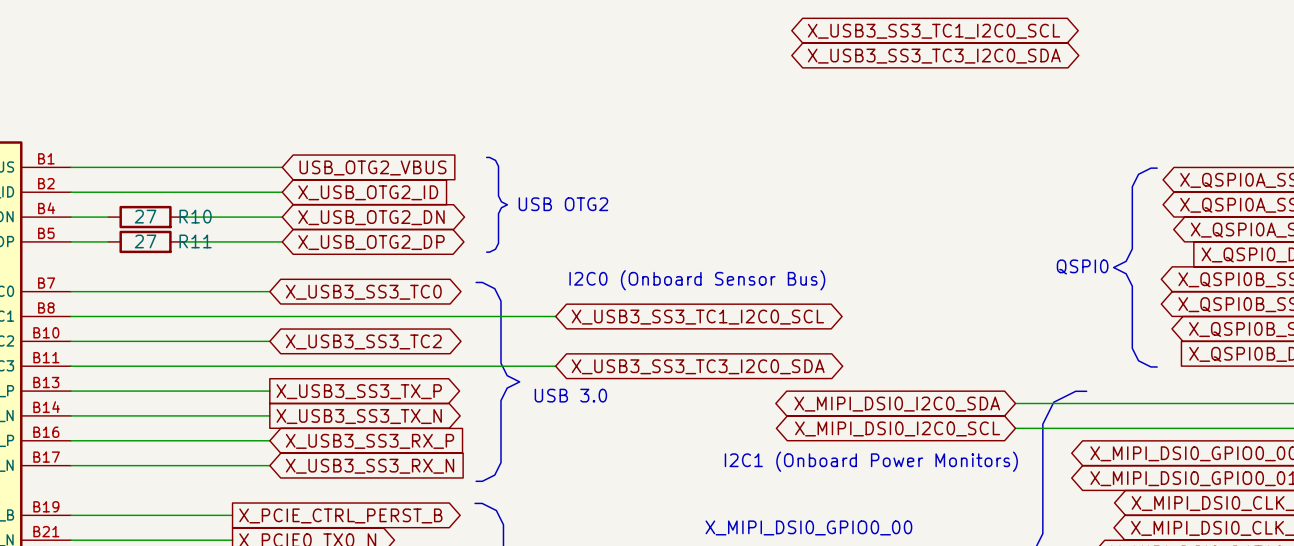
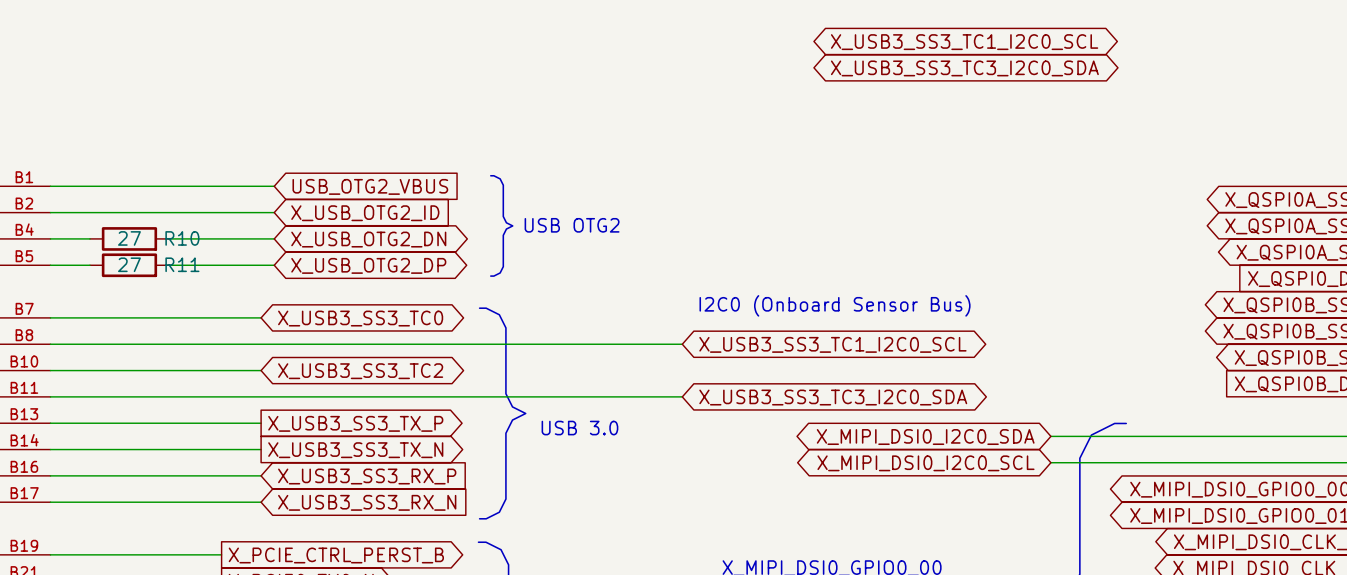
text: QSPI0 (1082, 266) -> none
text: { (1135, 267) -> none
text position: I2C0 (Onboard Sensor Bus) (697, 280) -> I2C0 (Onboard Sensor Bus) (835, 305)
wire: none -> (563, 344) (682, 344)
global label position: X_USB3_SS3_TC1_I2C0_SCL (697, 317) -> X_USB3_SS3_TC1_I2C0_SCL (832, 344)
wire: none -> (563, 396) (682, 396)
global label position: X_USB3_SS3_TC3_I2C0_SDA (698, 366) -> X_USB3_SS3_TC3_I2C0_SDA (833, 397)
text: I2C1 (Onboard Power Monitors) (871, 461) -> none

